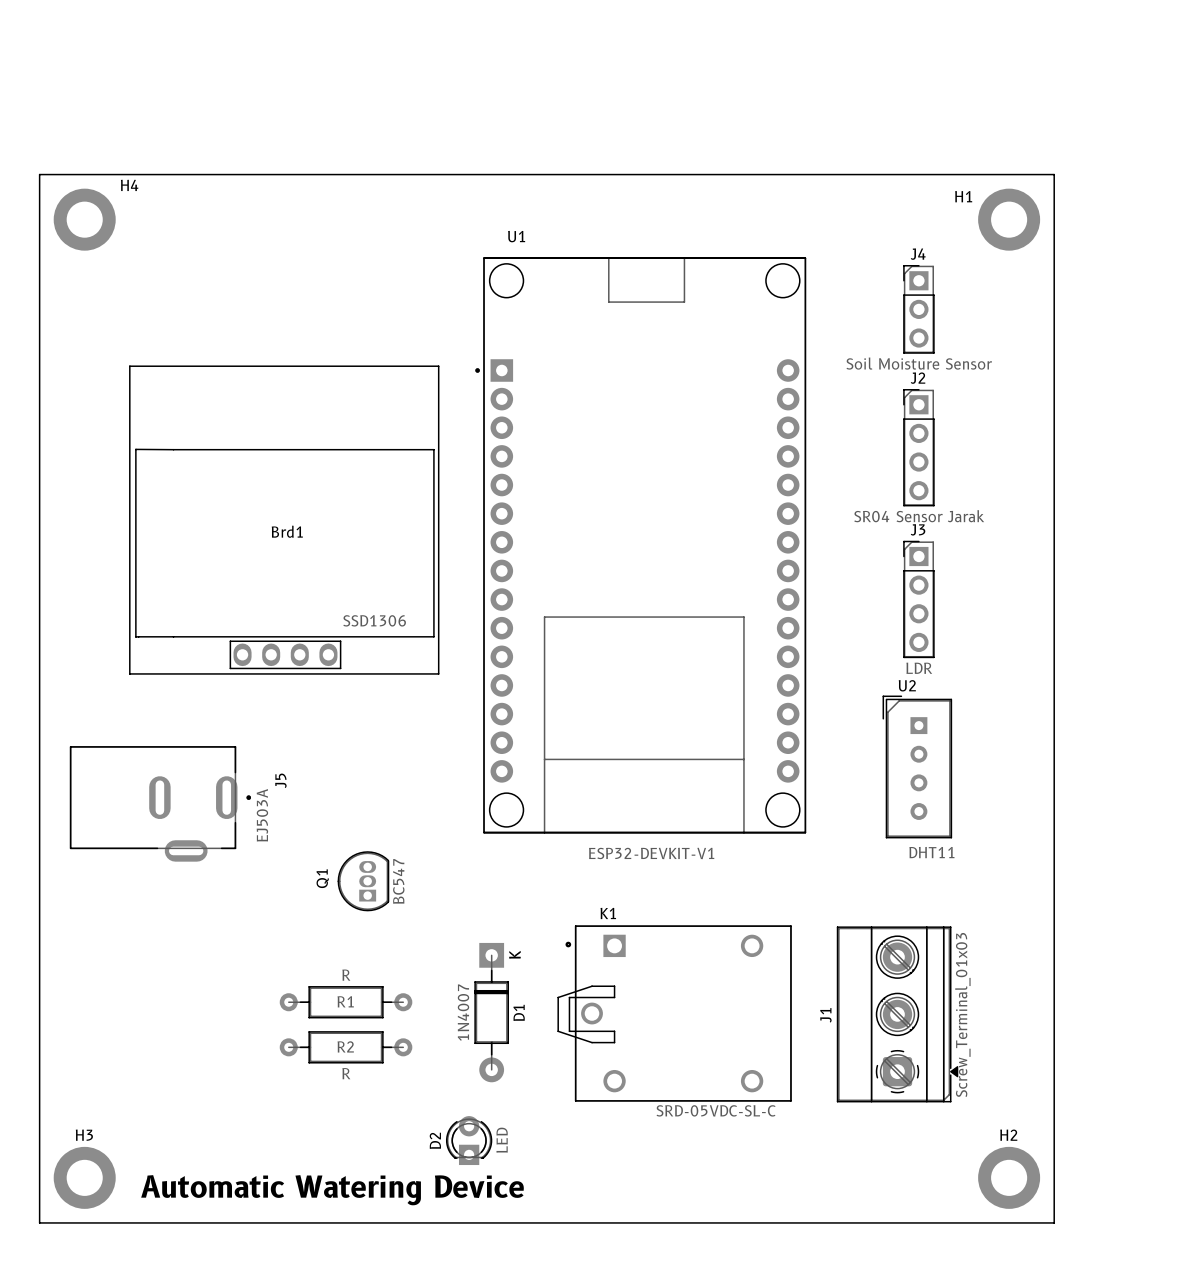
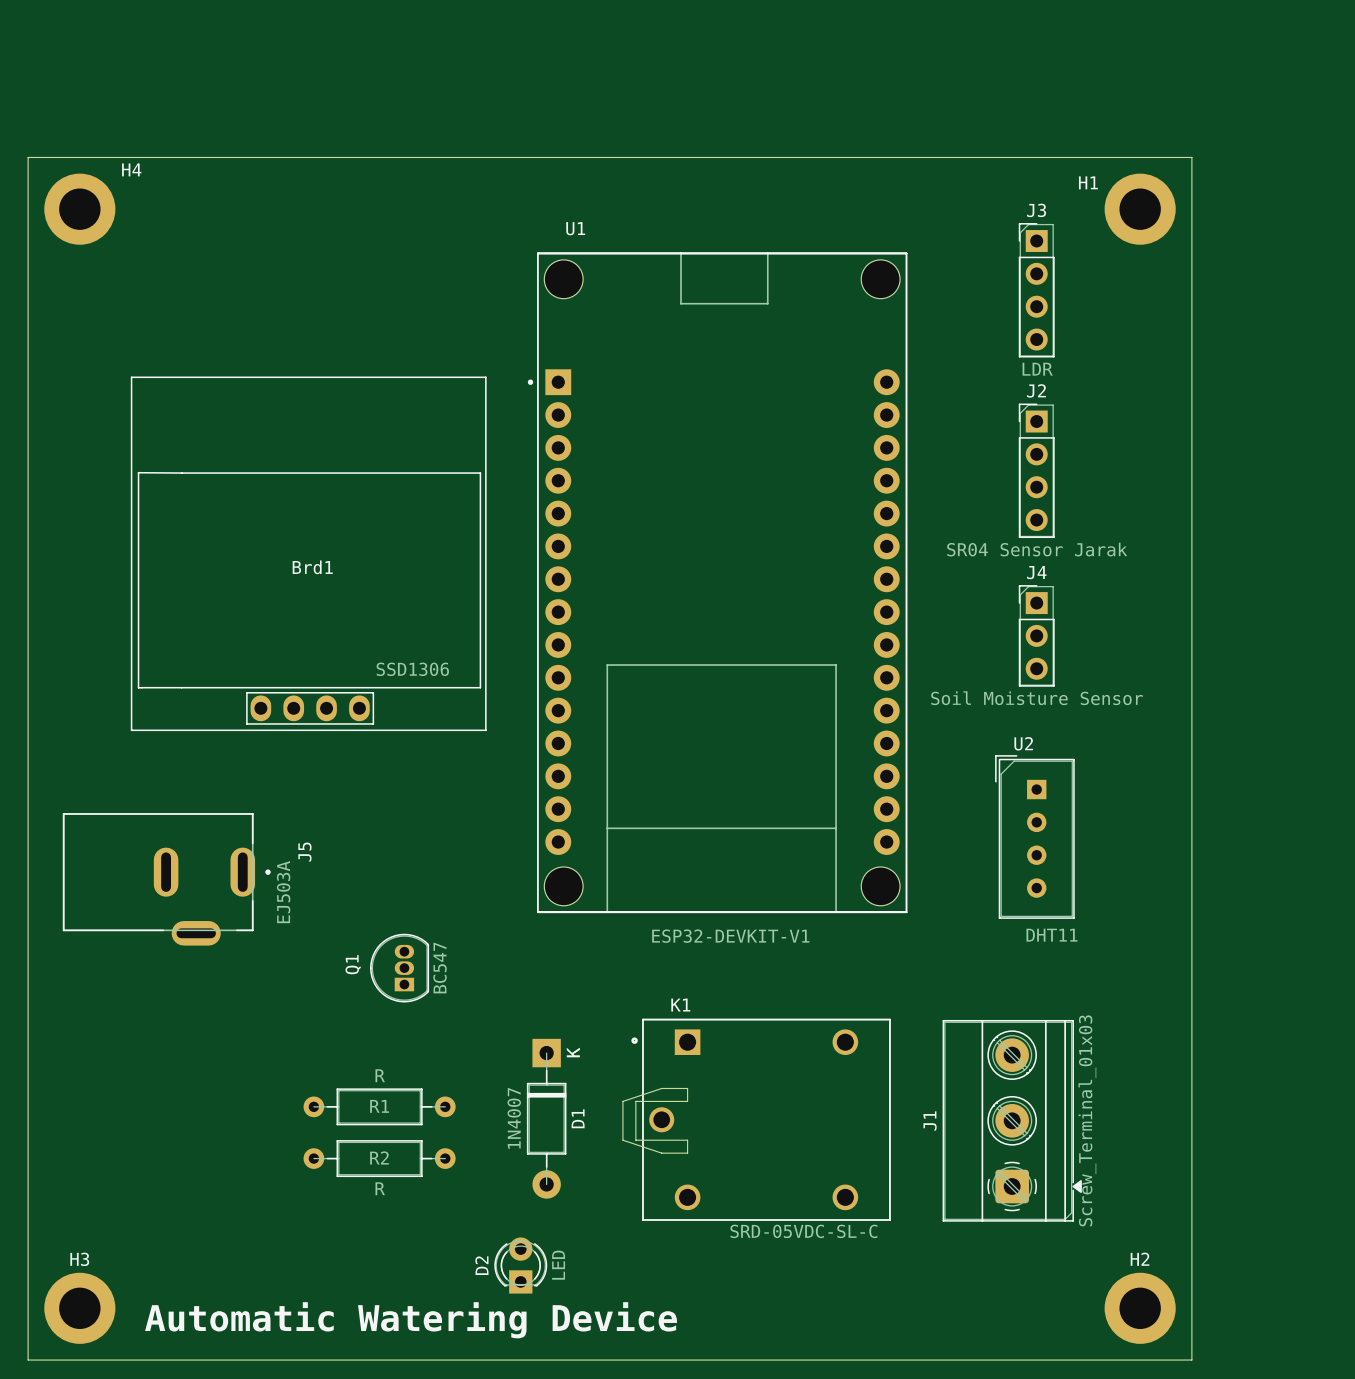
J4 position: (918, 309) -> (1036, 635)
J3 position: (918, 599) -> (1036, 290)

